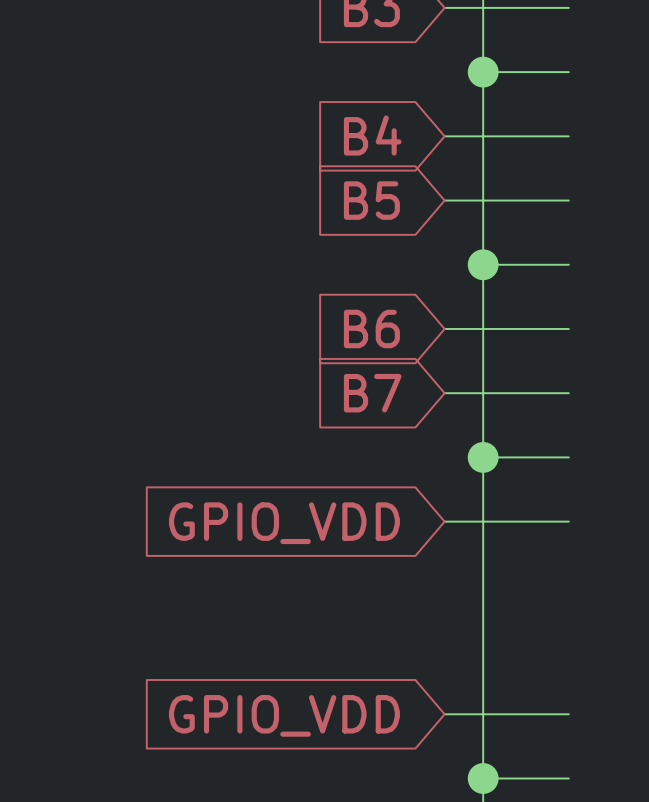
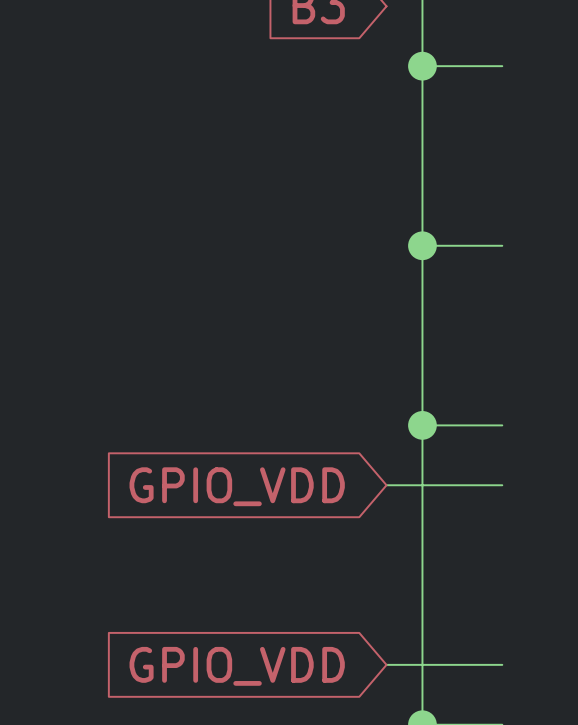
wire: (444, 7) (568, 7) -> none
global label: B4 (372, 135) -> none
wire: (444, 136) (568, 136) -> none
global label: B5 (371, 200) -> none
wire: (444, 200) (568, 200) -> none
global label: B6 (371, 328) -> none
wire: (444, 328) (568, 328) -> none
global label: B7 (372, 393) -> none
wire: (444, 393) (568, 393) -> none

